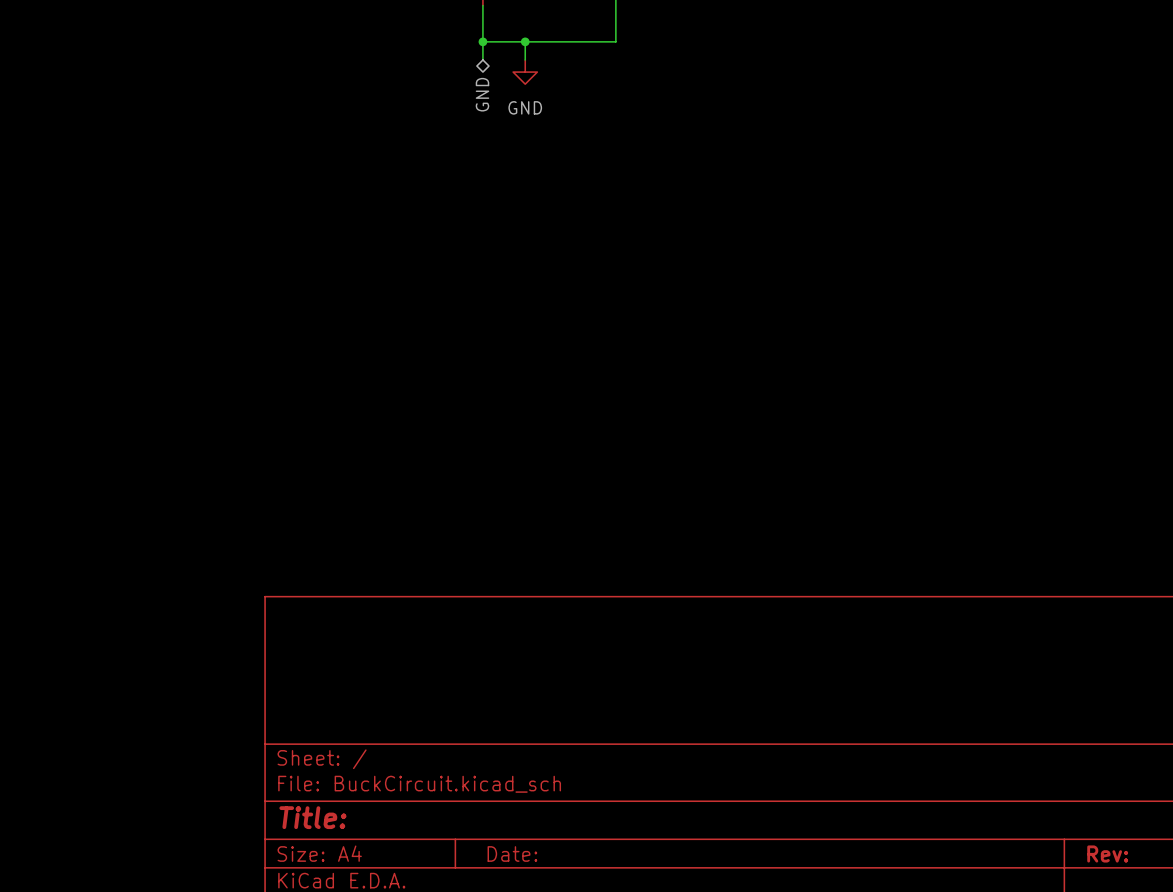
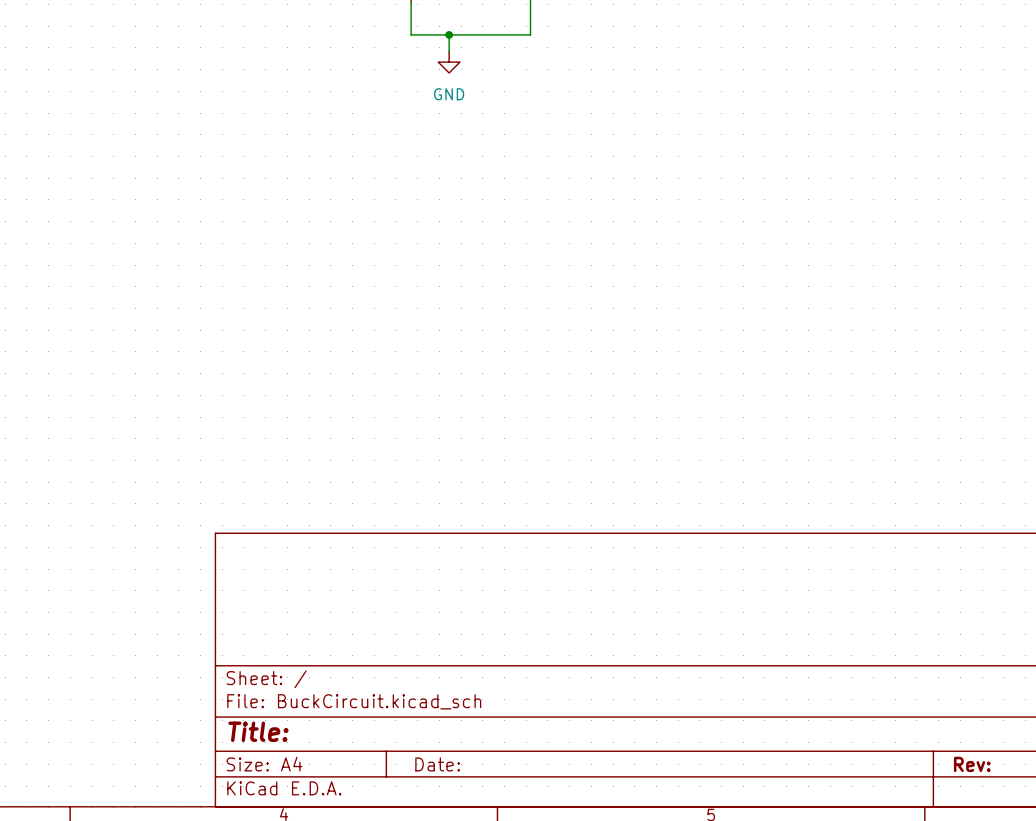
wire: (482, 41) (482, 59) -> none
junction: (482, 41) -> none
hierarchical label: GND (482, 94) -> none

